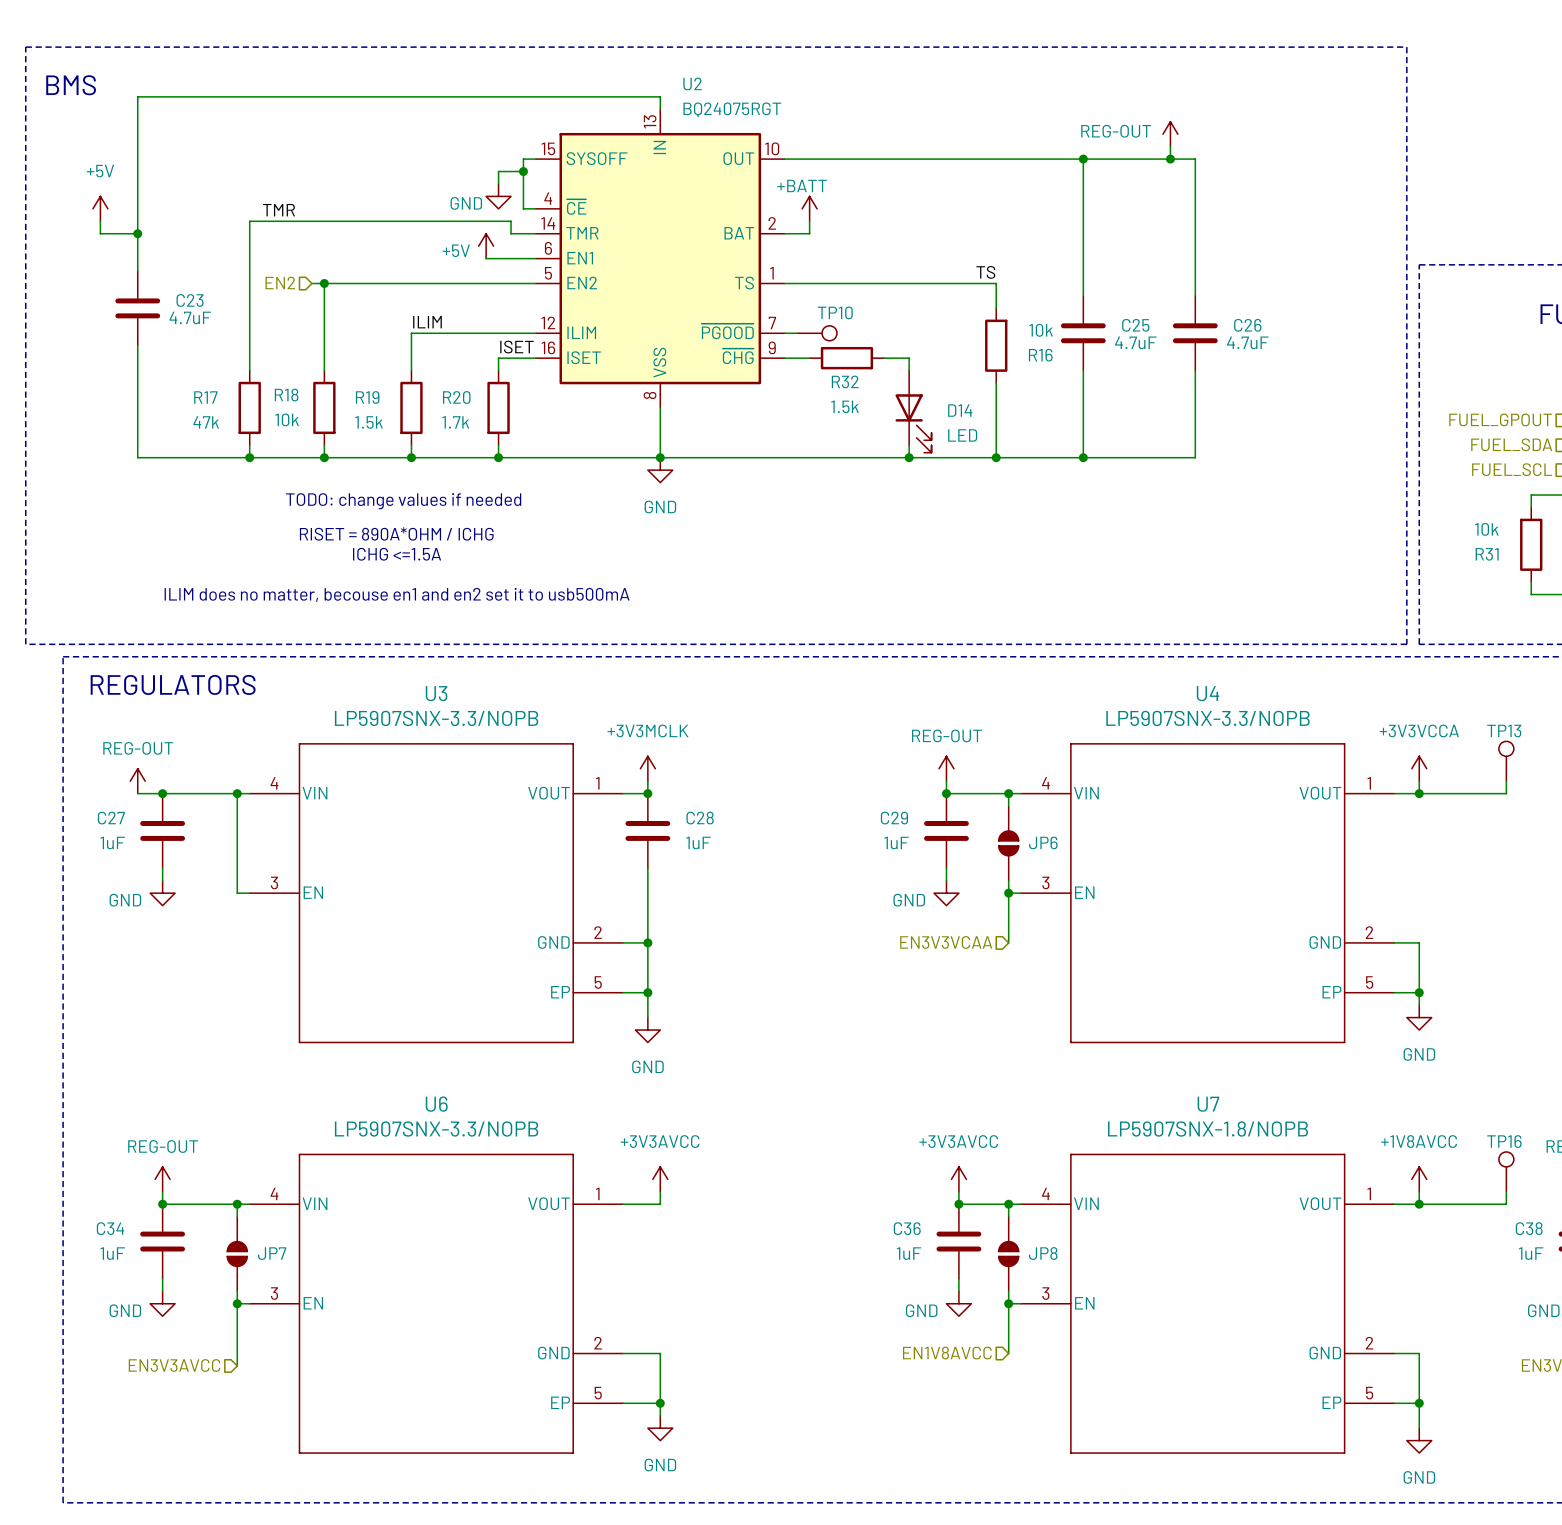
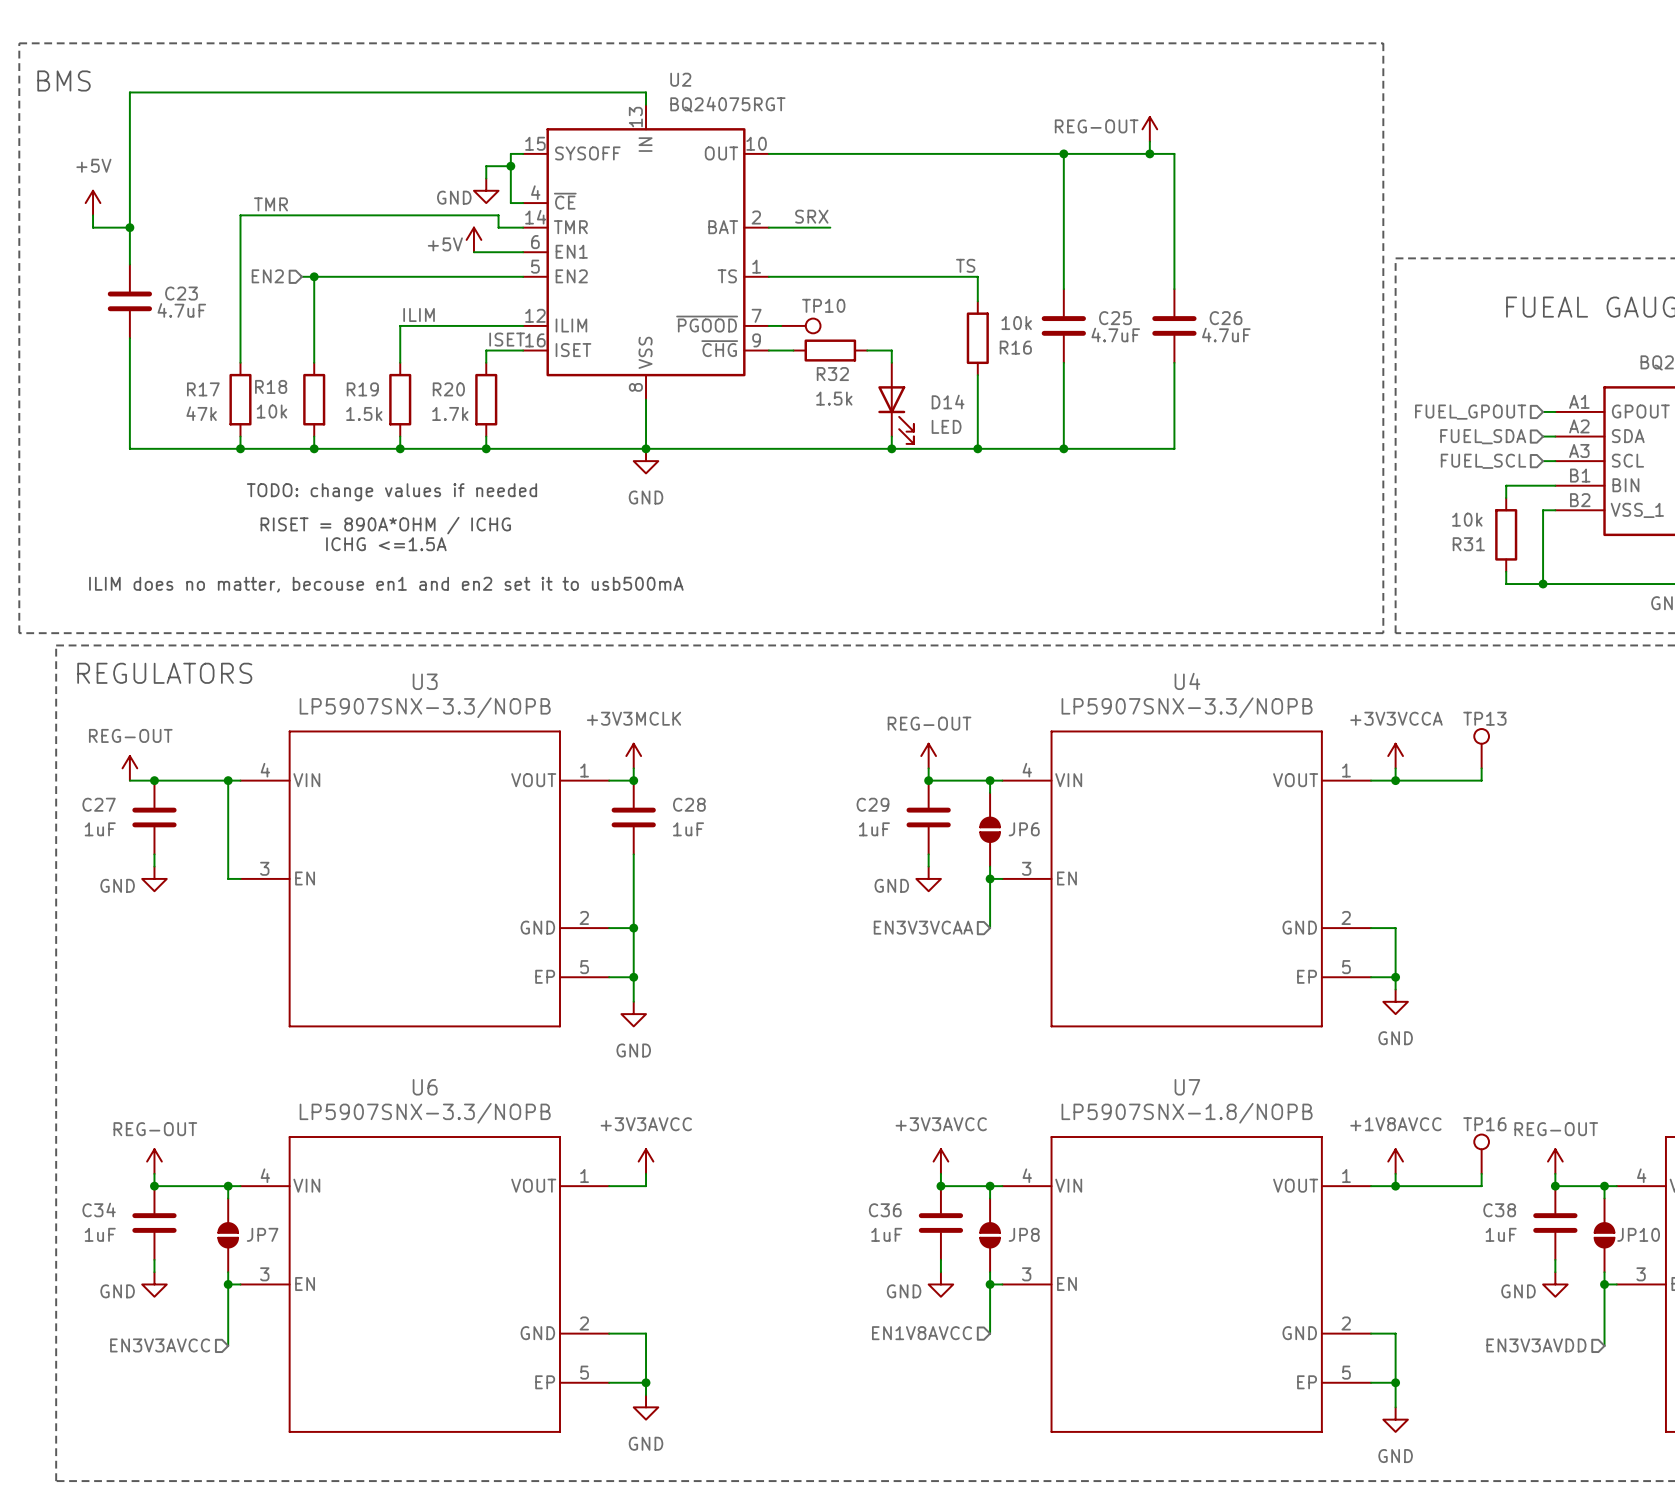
power symbol: +BATT (809, 208) -> none
wire: (809, 221) (809, 233) -> (830, 227) (793, 227)
label: none -> SRX (811, 216)

